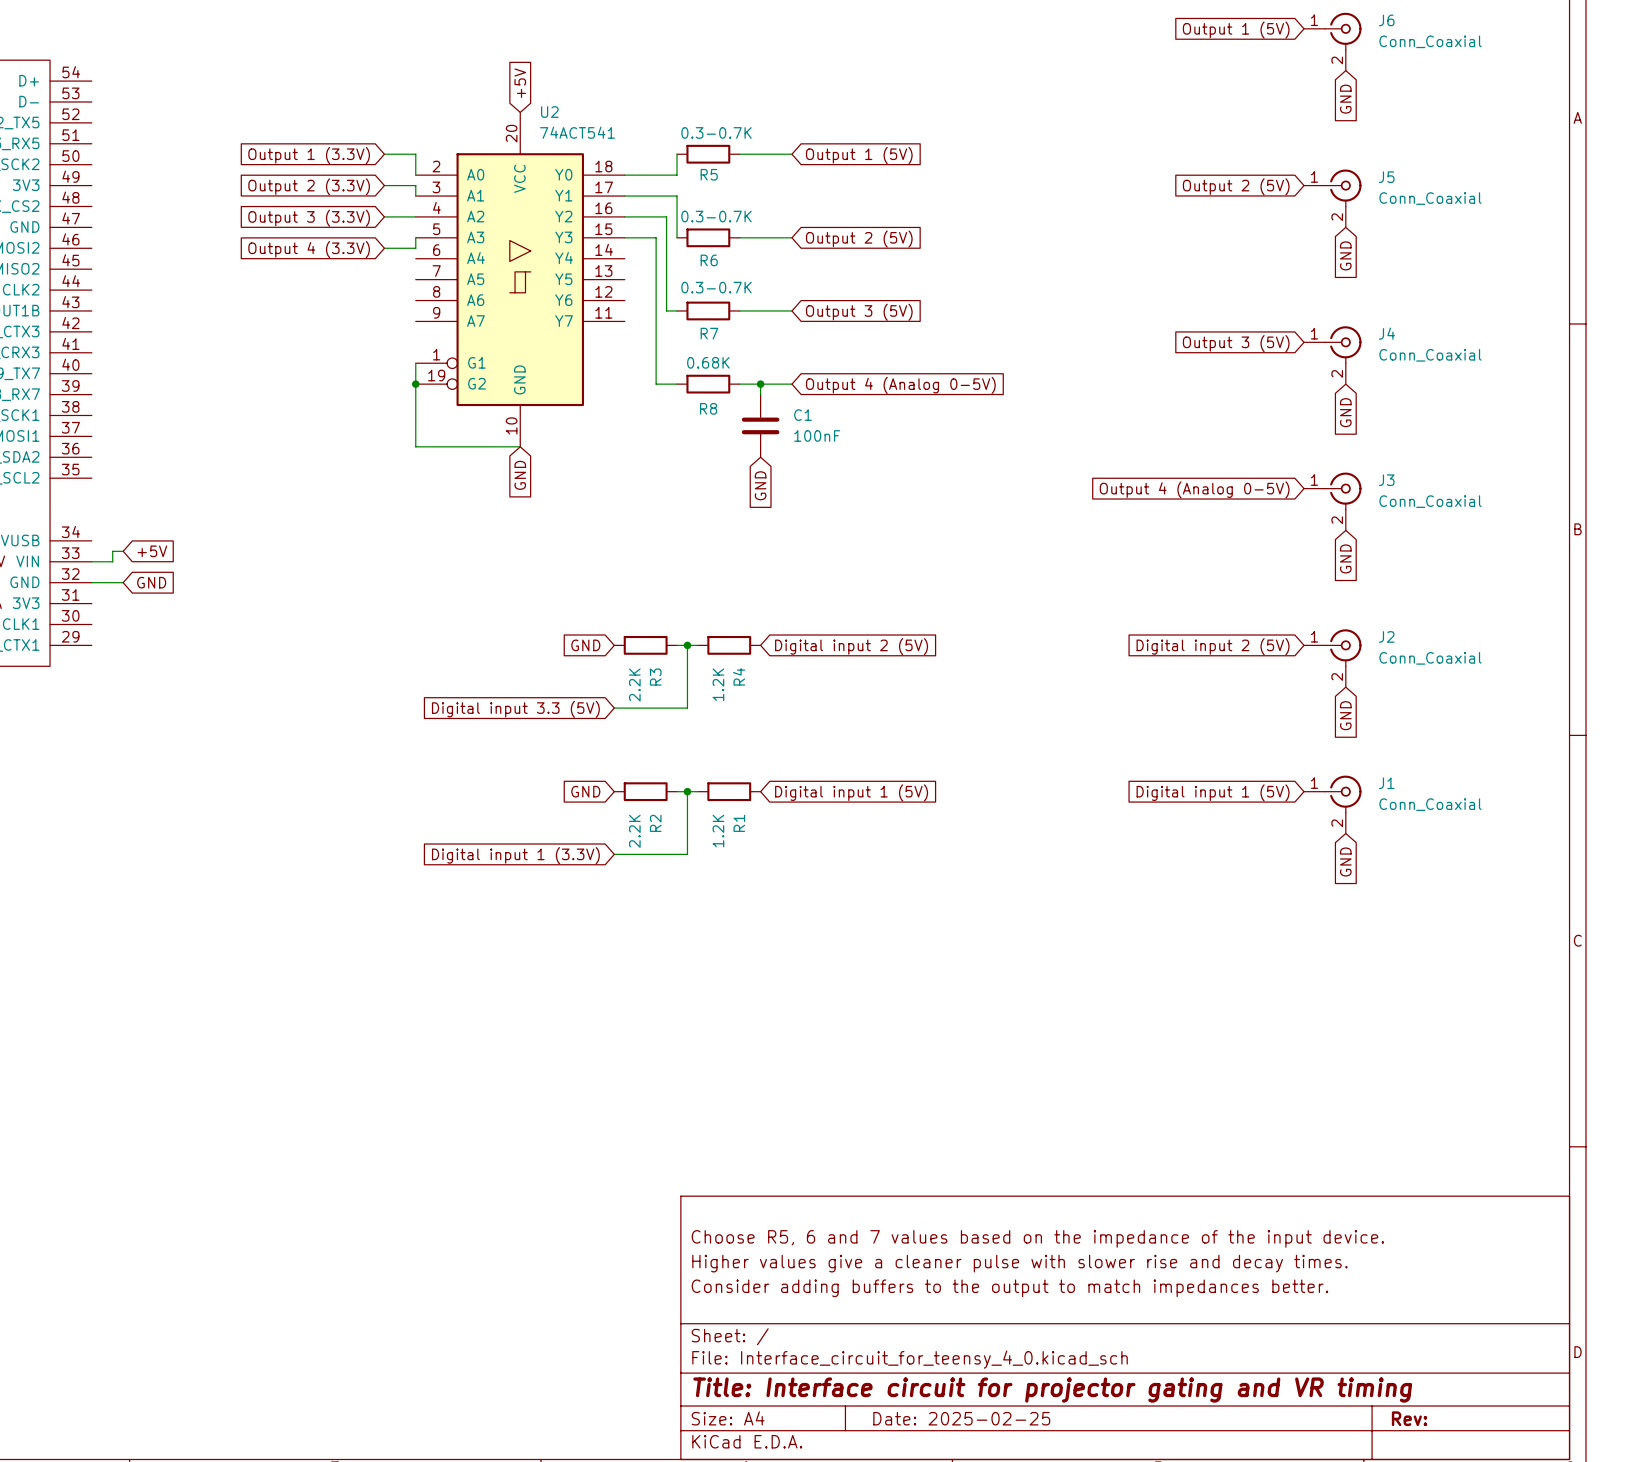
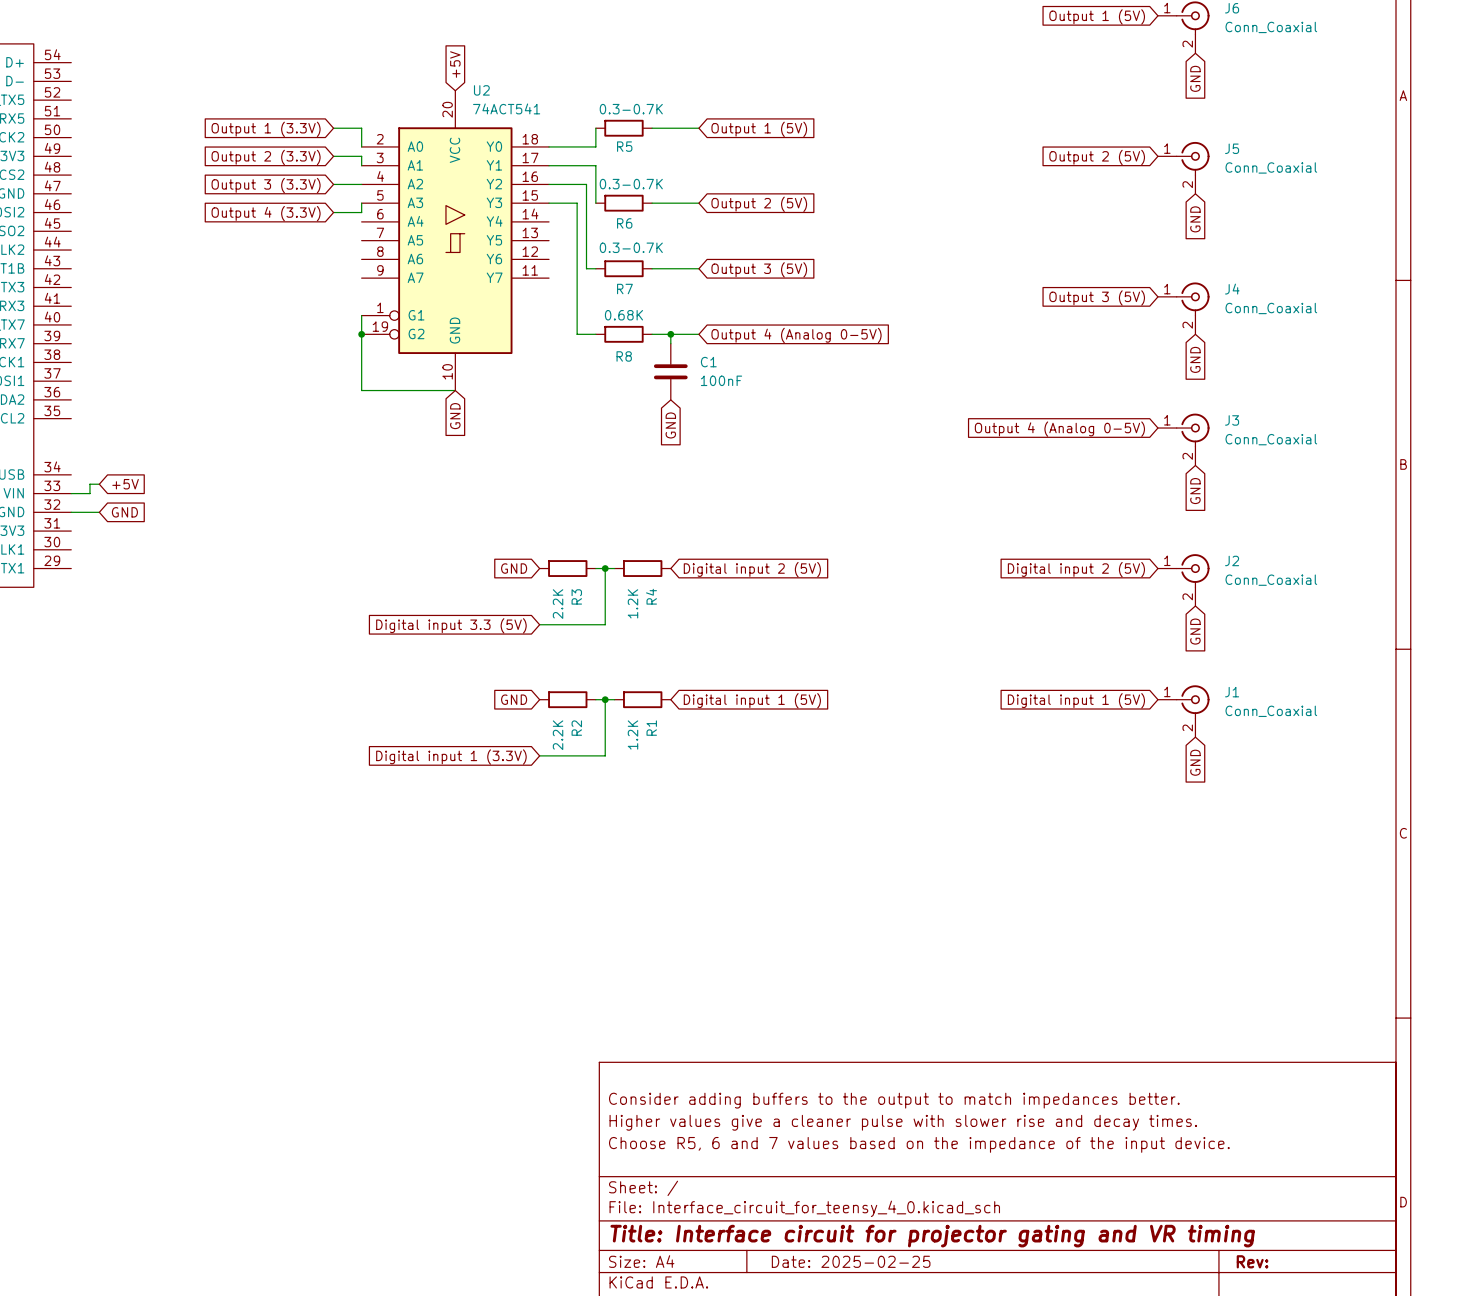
title block: Choose R5, 6 and 7 values based on the impedance of the input device. (1037, 1238) -> Consider adding buffers to the output to match impedances better. (894, 1100)
title block: Consider adding buffers to the output to match impedances better. (1009, 1288) -> Choose R5, 6 and 7 values based on the impedance of the input device. (919, 1144)

